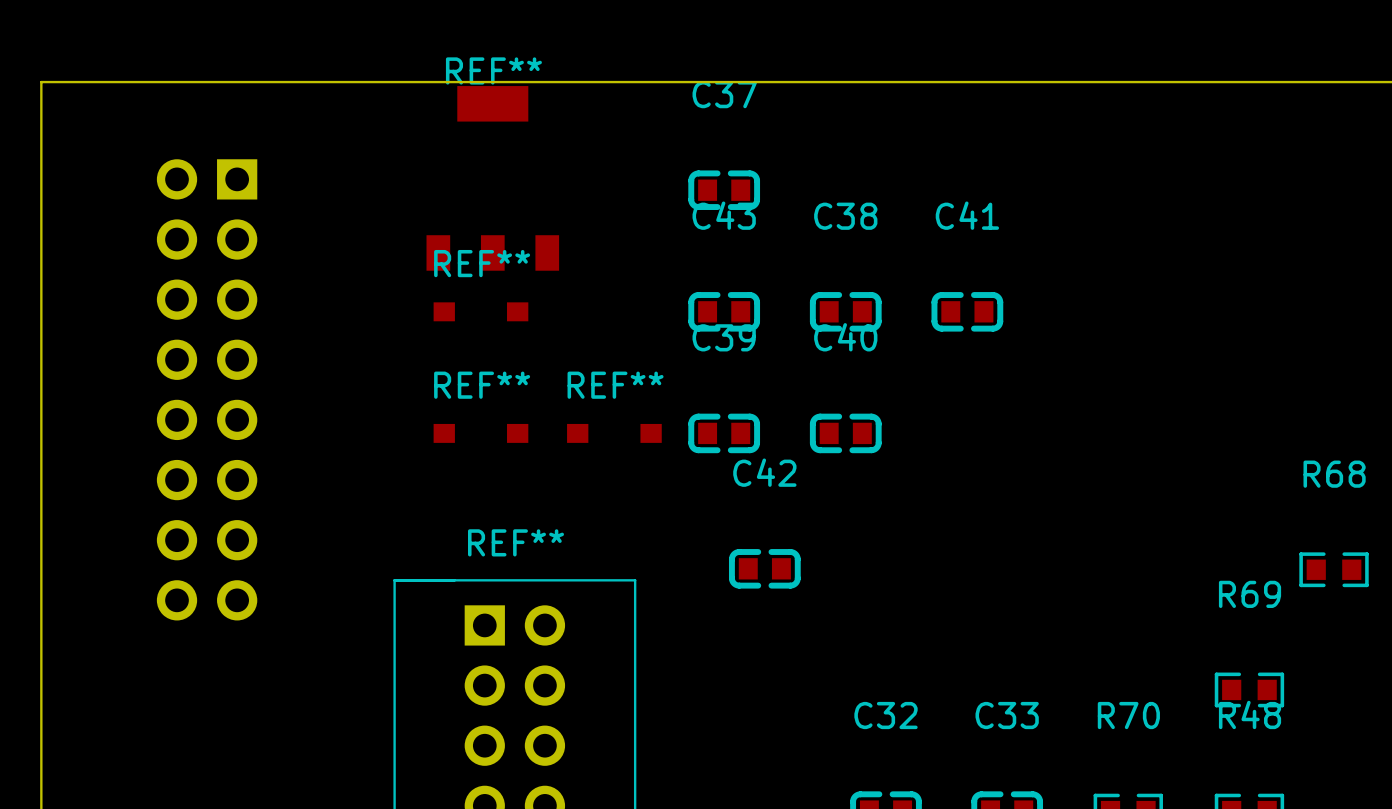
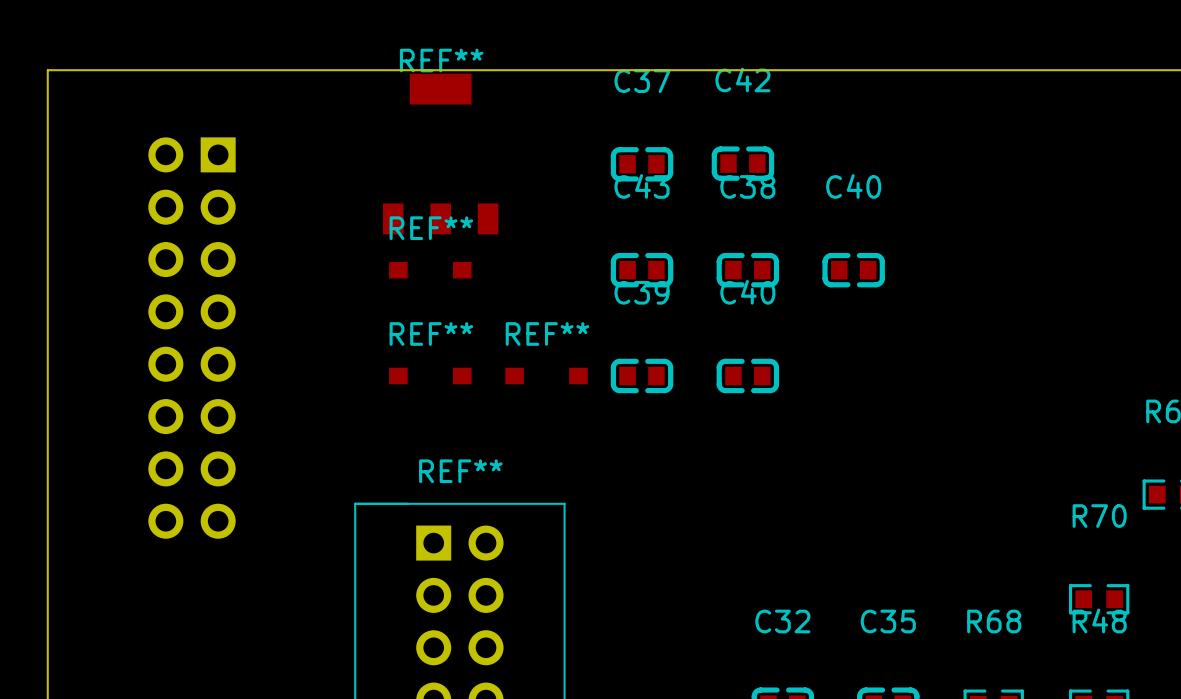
C41 name: C41 (967, 215) -> C40 (853, 186)
C42 position: (764, 568) -> (742, 163)
R69 name: R69 (1250, 594) -> R70 (1099, 516)
C33 name: C33 (1007, 715) -> C35 (888, 621)
R70 name: R70 (1128, 715) -> R68 (994, 621)

